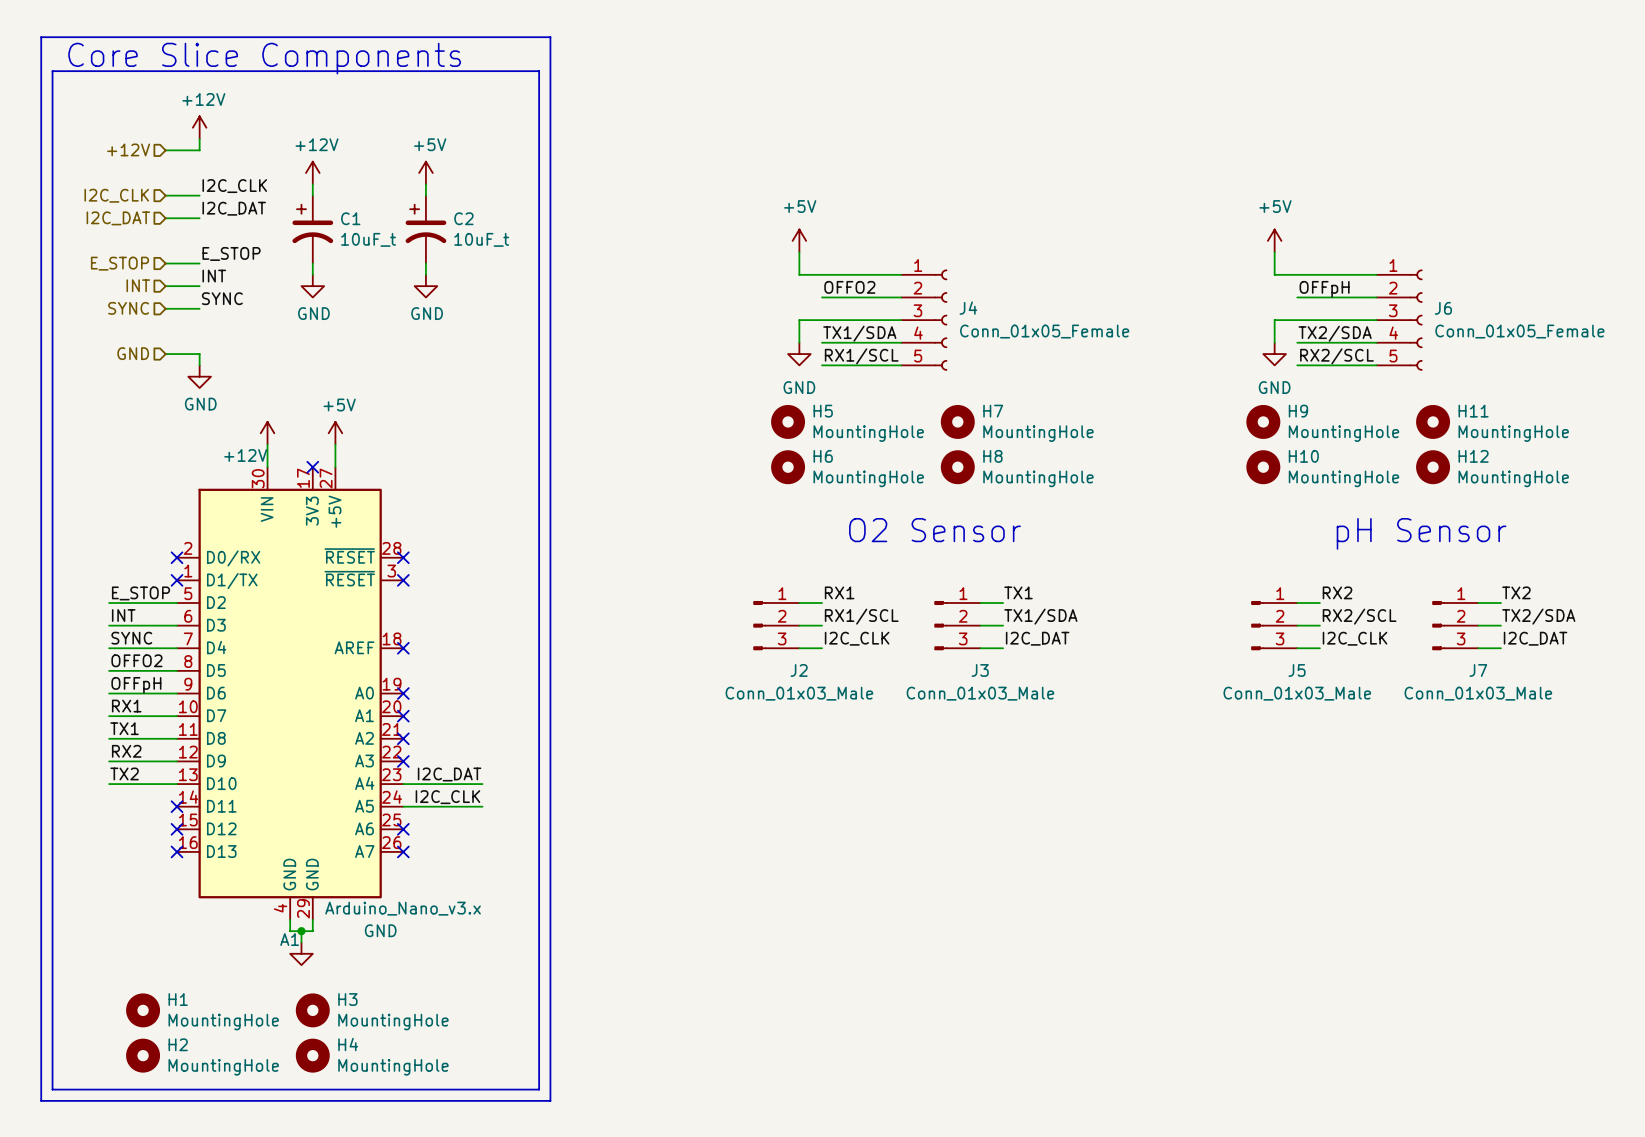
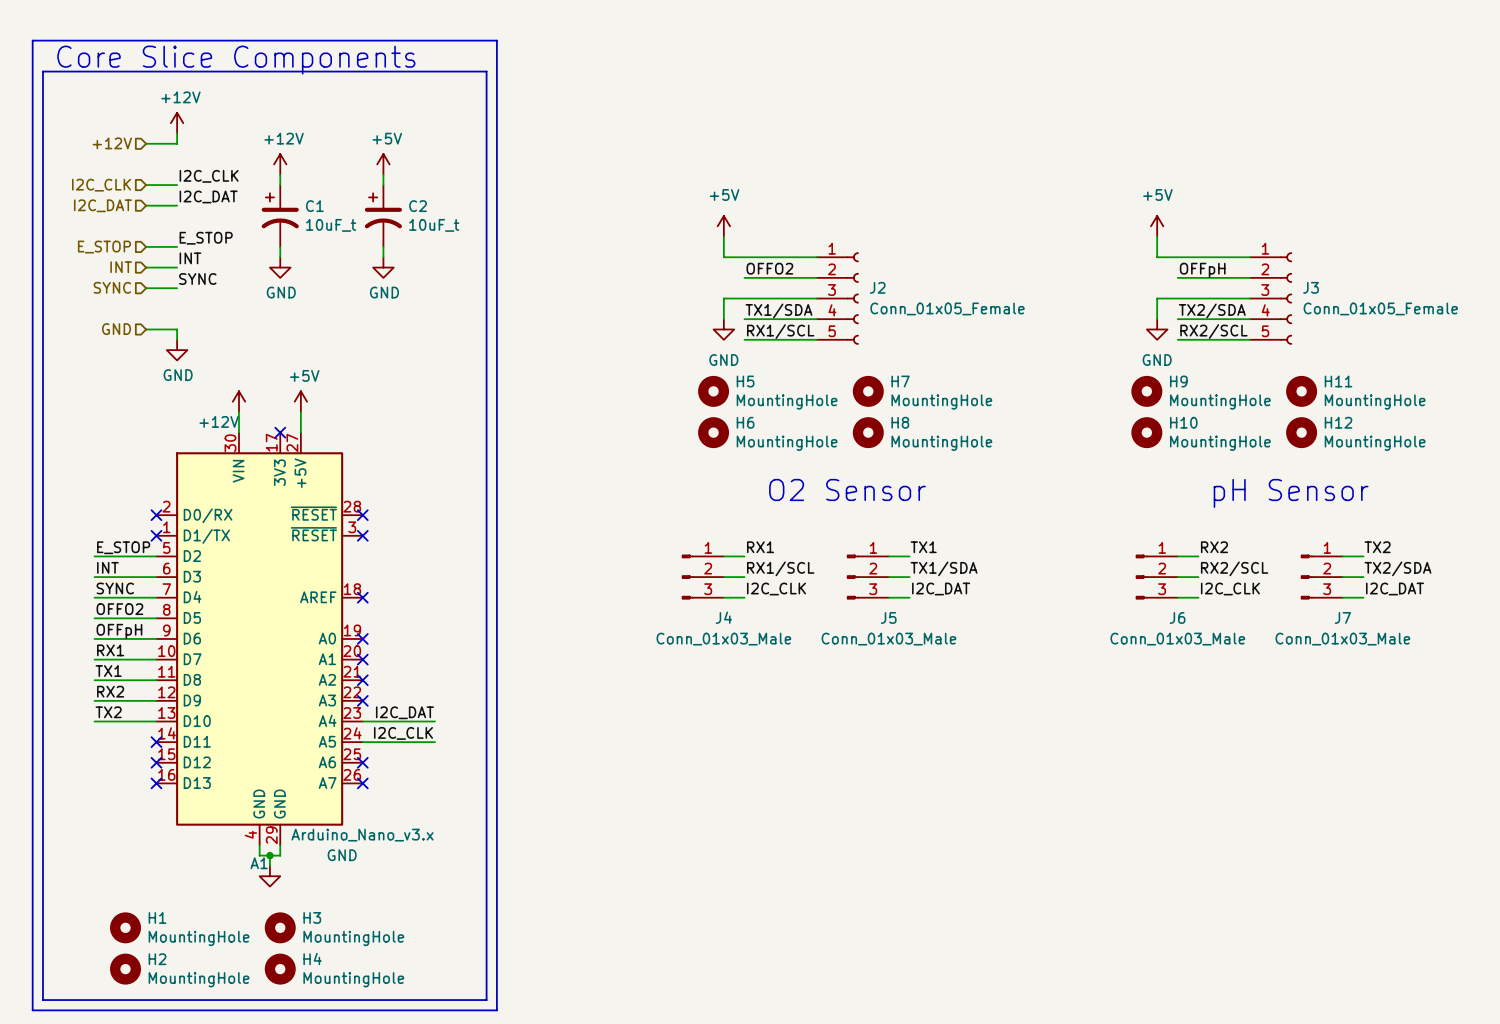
J4 name: J4 (968, 308) -> J2 (877, 287)
J6 name: J6 (1443, 308) -> J3 (1311, 287)
J2 name: J2 (799, 670) -> J4 (723, 617)
J3 name: J3 (980, 670) -> J5 (888, 617)
J5 name: J5 (1297, 670) -> J6 (1177, 617)

